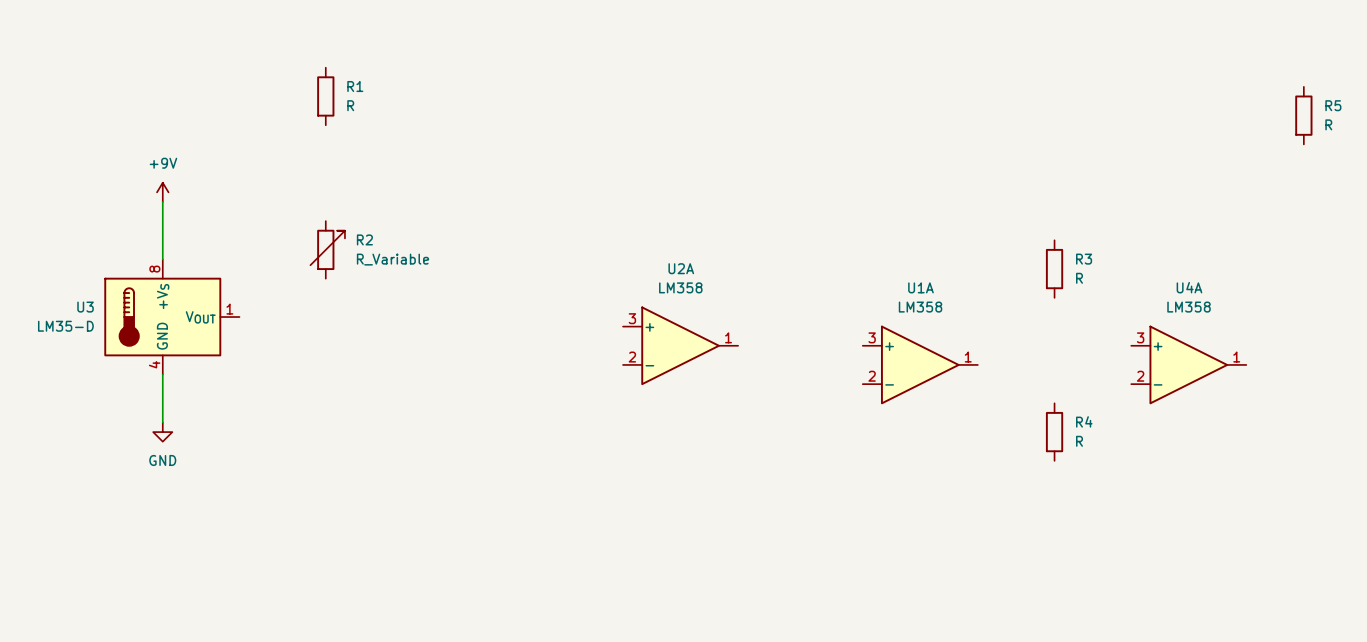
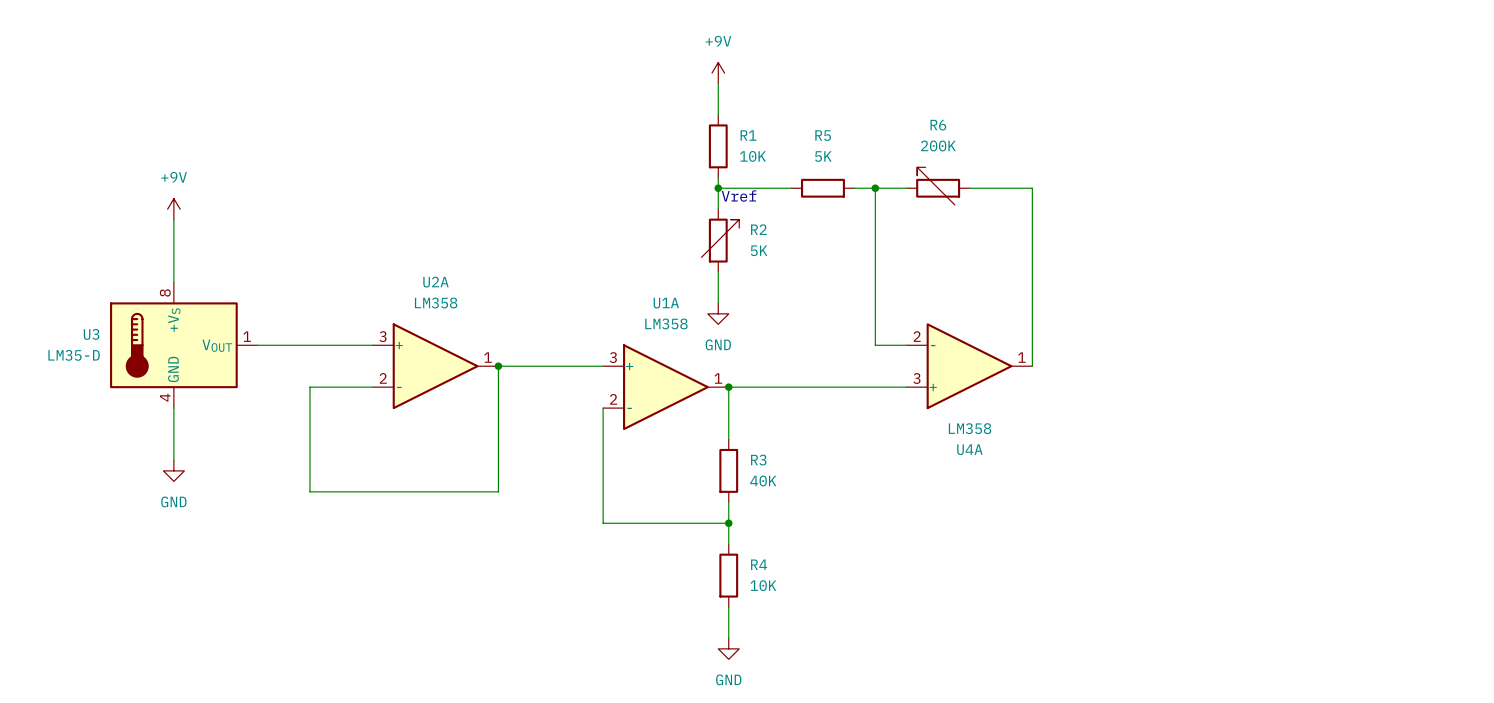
power symbol: none -> +9V (718, 73)
wire: none -> (718, 83) (718, 114)
R1 position: (325, 96) -> (718, 146)
R1 value: R (350, 105) -> 10K (752, 156)
R5 name position: R5 (1333, 105) -> R5 (823, 135)
R5 rotation: 0° (1303, 115) -> 90° clockwise (822, 188)
R5 position: (1303, 115) -> (822, 188)
R5 value: R (1328, 124) -> 5K (823, 156)
wire: none -> (718, 177) (718, 209)
R6: none -> 200K (938, 186)
wire: none -> (718, 188) (791, 188)
junction: none -> (718, 188)
wire: none -> (854, 188) (906, 188)
wire: none -> (875, 188) (875, 345) (906, 345)
junction: none -> (875, 188)
wire: none -> (969, 188) (1032, 188) (1032, 366)
text: none -> Vref (739, 196)
R2 position: (327, 249) -> (720, 240)
wire: none -> (718, 271) (718, 303)
R2 value: R_Variable (392, 259) -> 5K (759, 250)
R3 position: (1054, 269) -> (728, 470)
R3 value: R (1079, 278) -> 40K (763, 480)
power symbol: none -> GND (718, 313)
wire: none -> (257, 345) (372, 345)
junction: none -> (498, 366)
wire: none -> (603, 366) (498, 366) (498, 491) (309, 491) (309, 387) (372, 387)
U2A position: (680, 345) -> (435, 366)
junction: none -> (728, 387)
wire: none -> (906, 387) (728, 387) (728, 439)
U1A position: (920, 364) -> (665, 387)
U4A flip: as is (1188, 364) -> up-down (969, 366)
U4A position: (1188, 364) -> (969, 366)
wire: none -> (603, 408) (603, 523) (728, 523)
R4 position: (1054, 432) -> (728, 575)
R4 value: R (1079, 441) -> 10K (763, 585)
wire: none -> (728, 502) (728, 544)
junction: none -> (728, 523)
wire: none -> (728, 607) (728, 638)
power symbol: none -> GND (728, 648)

